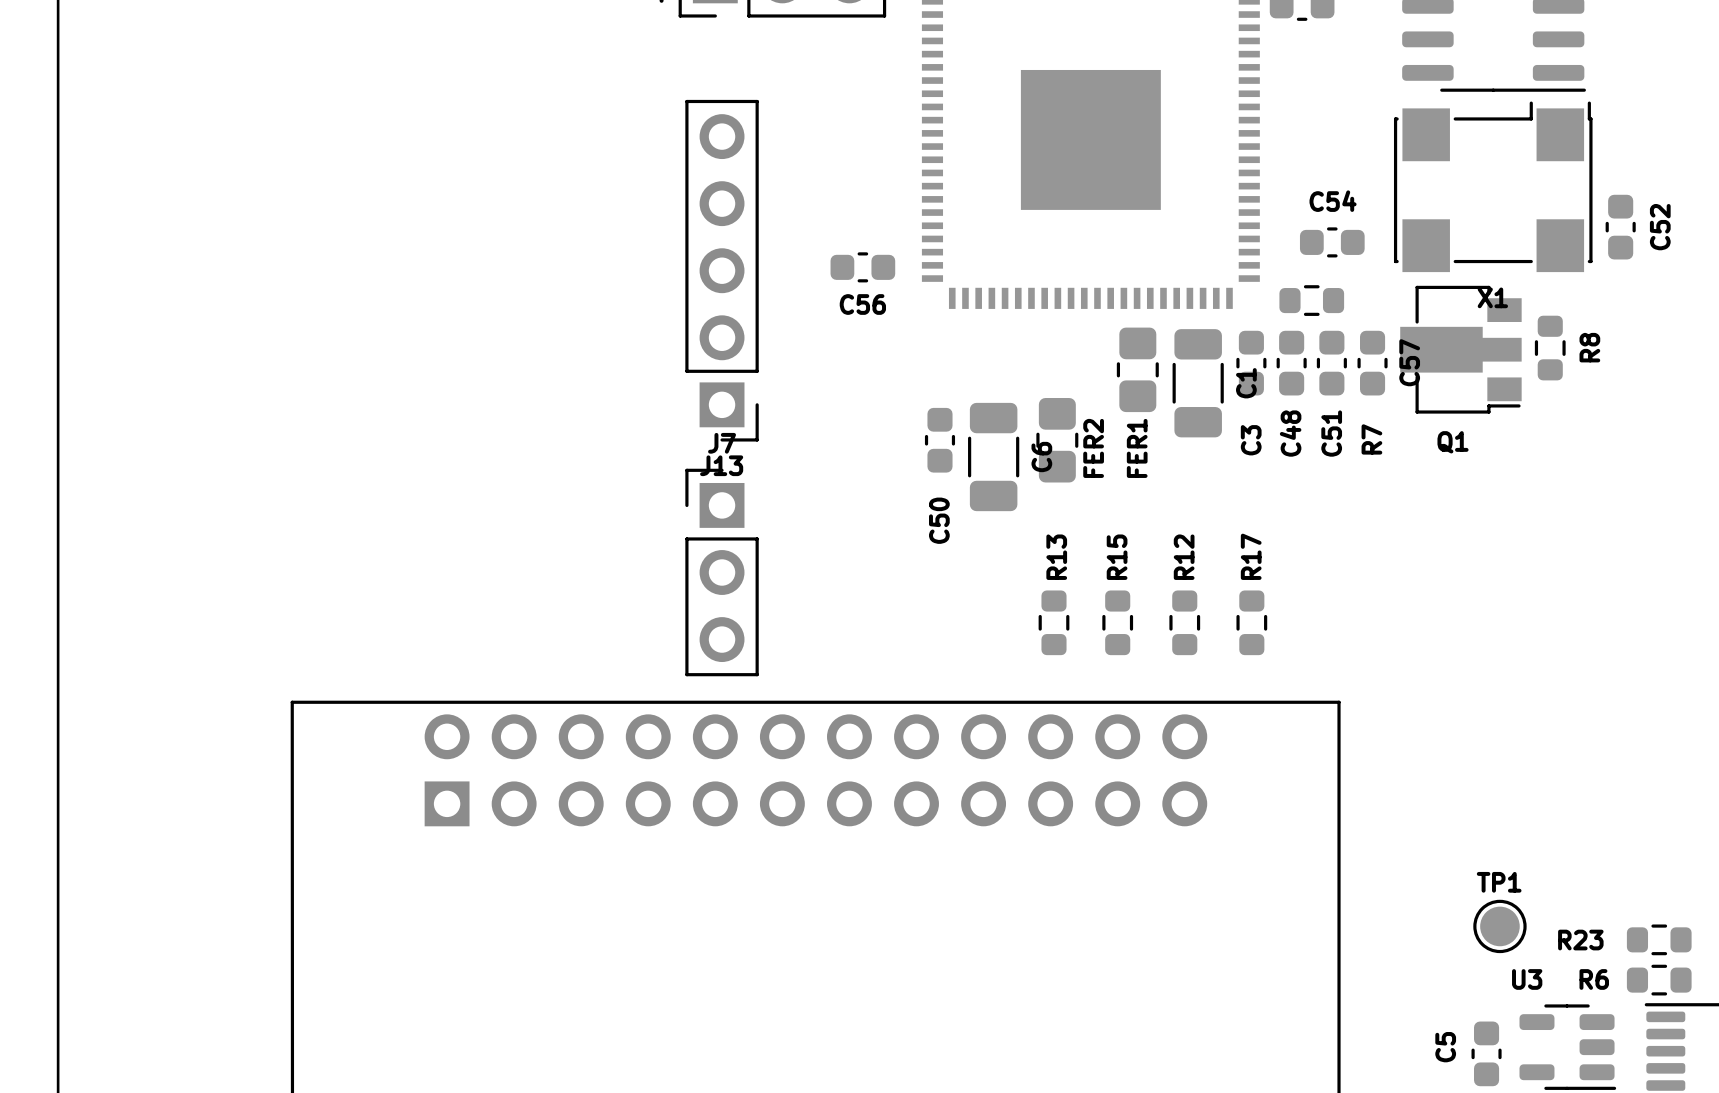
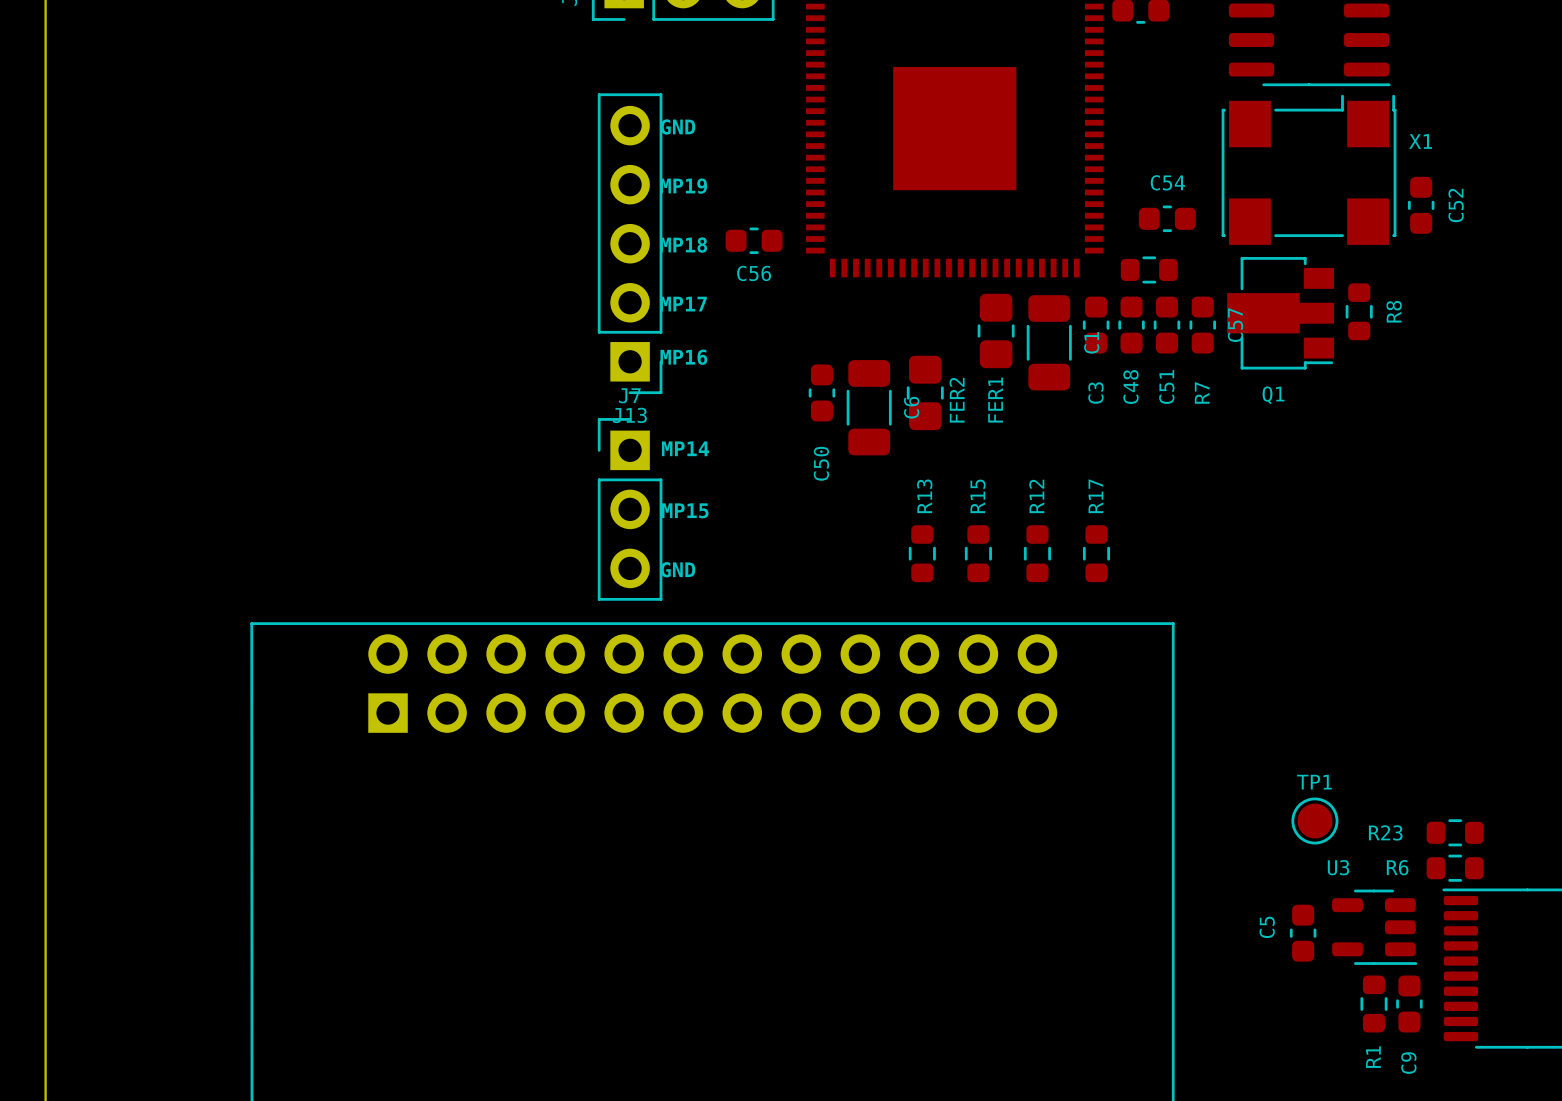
text: none -> GND (678, 126)
text: none -> MP19 (683, 186)
text: none -> MP18 (683, 245)
X1 name position: X1 (1492, 297) -> X1 (1420, 141)
text: none -> MP17 (683, 304)
text: none -> MP16 (683, 357)
text: none -> MP14 (685, 448)
text: none -> MP15 (685, 510)
text: none -> GND (678, 569)

